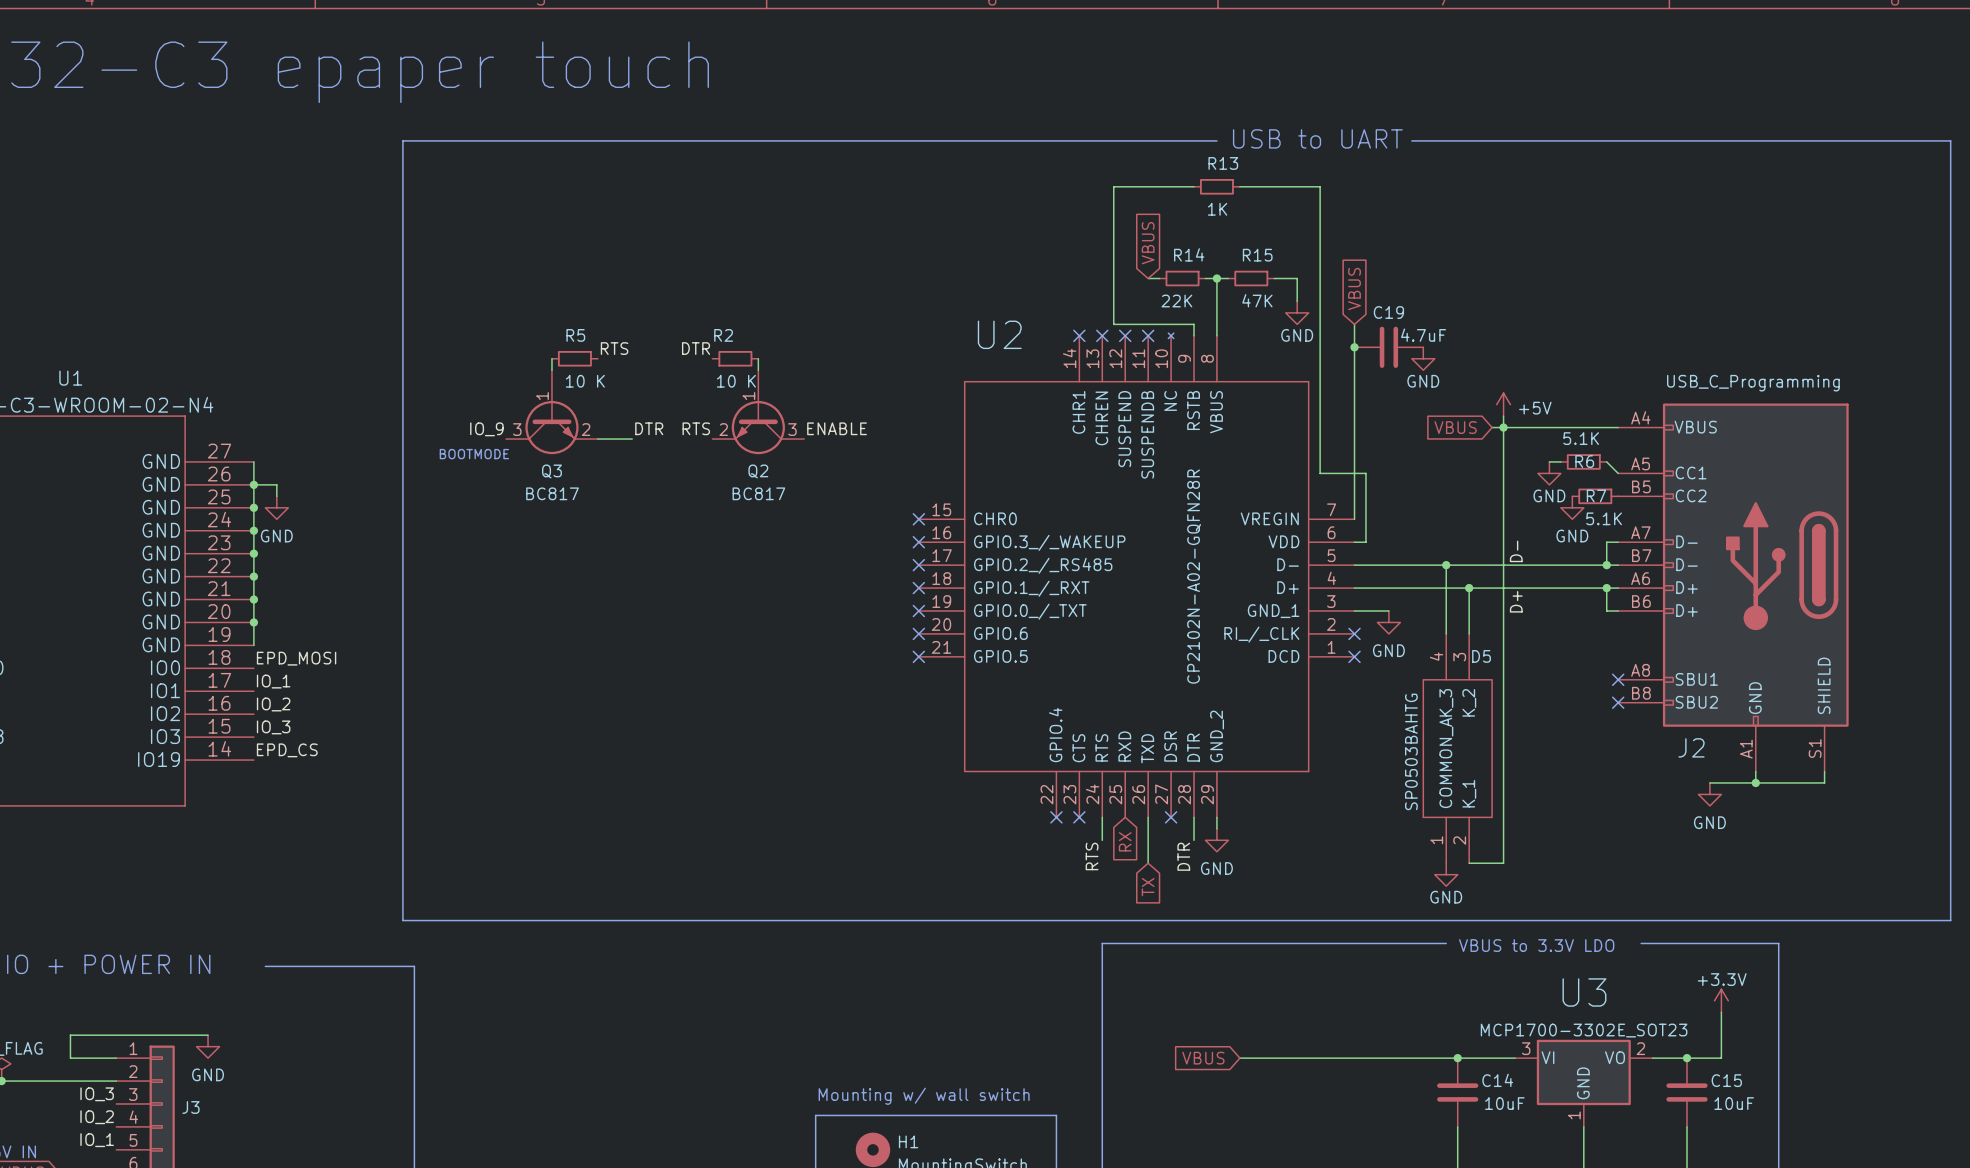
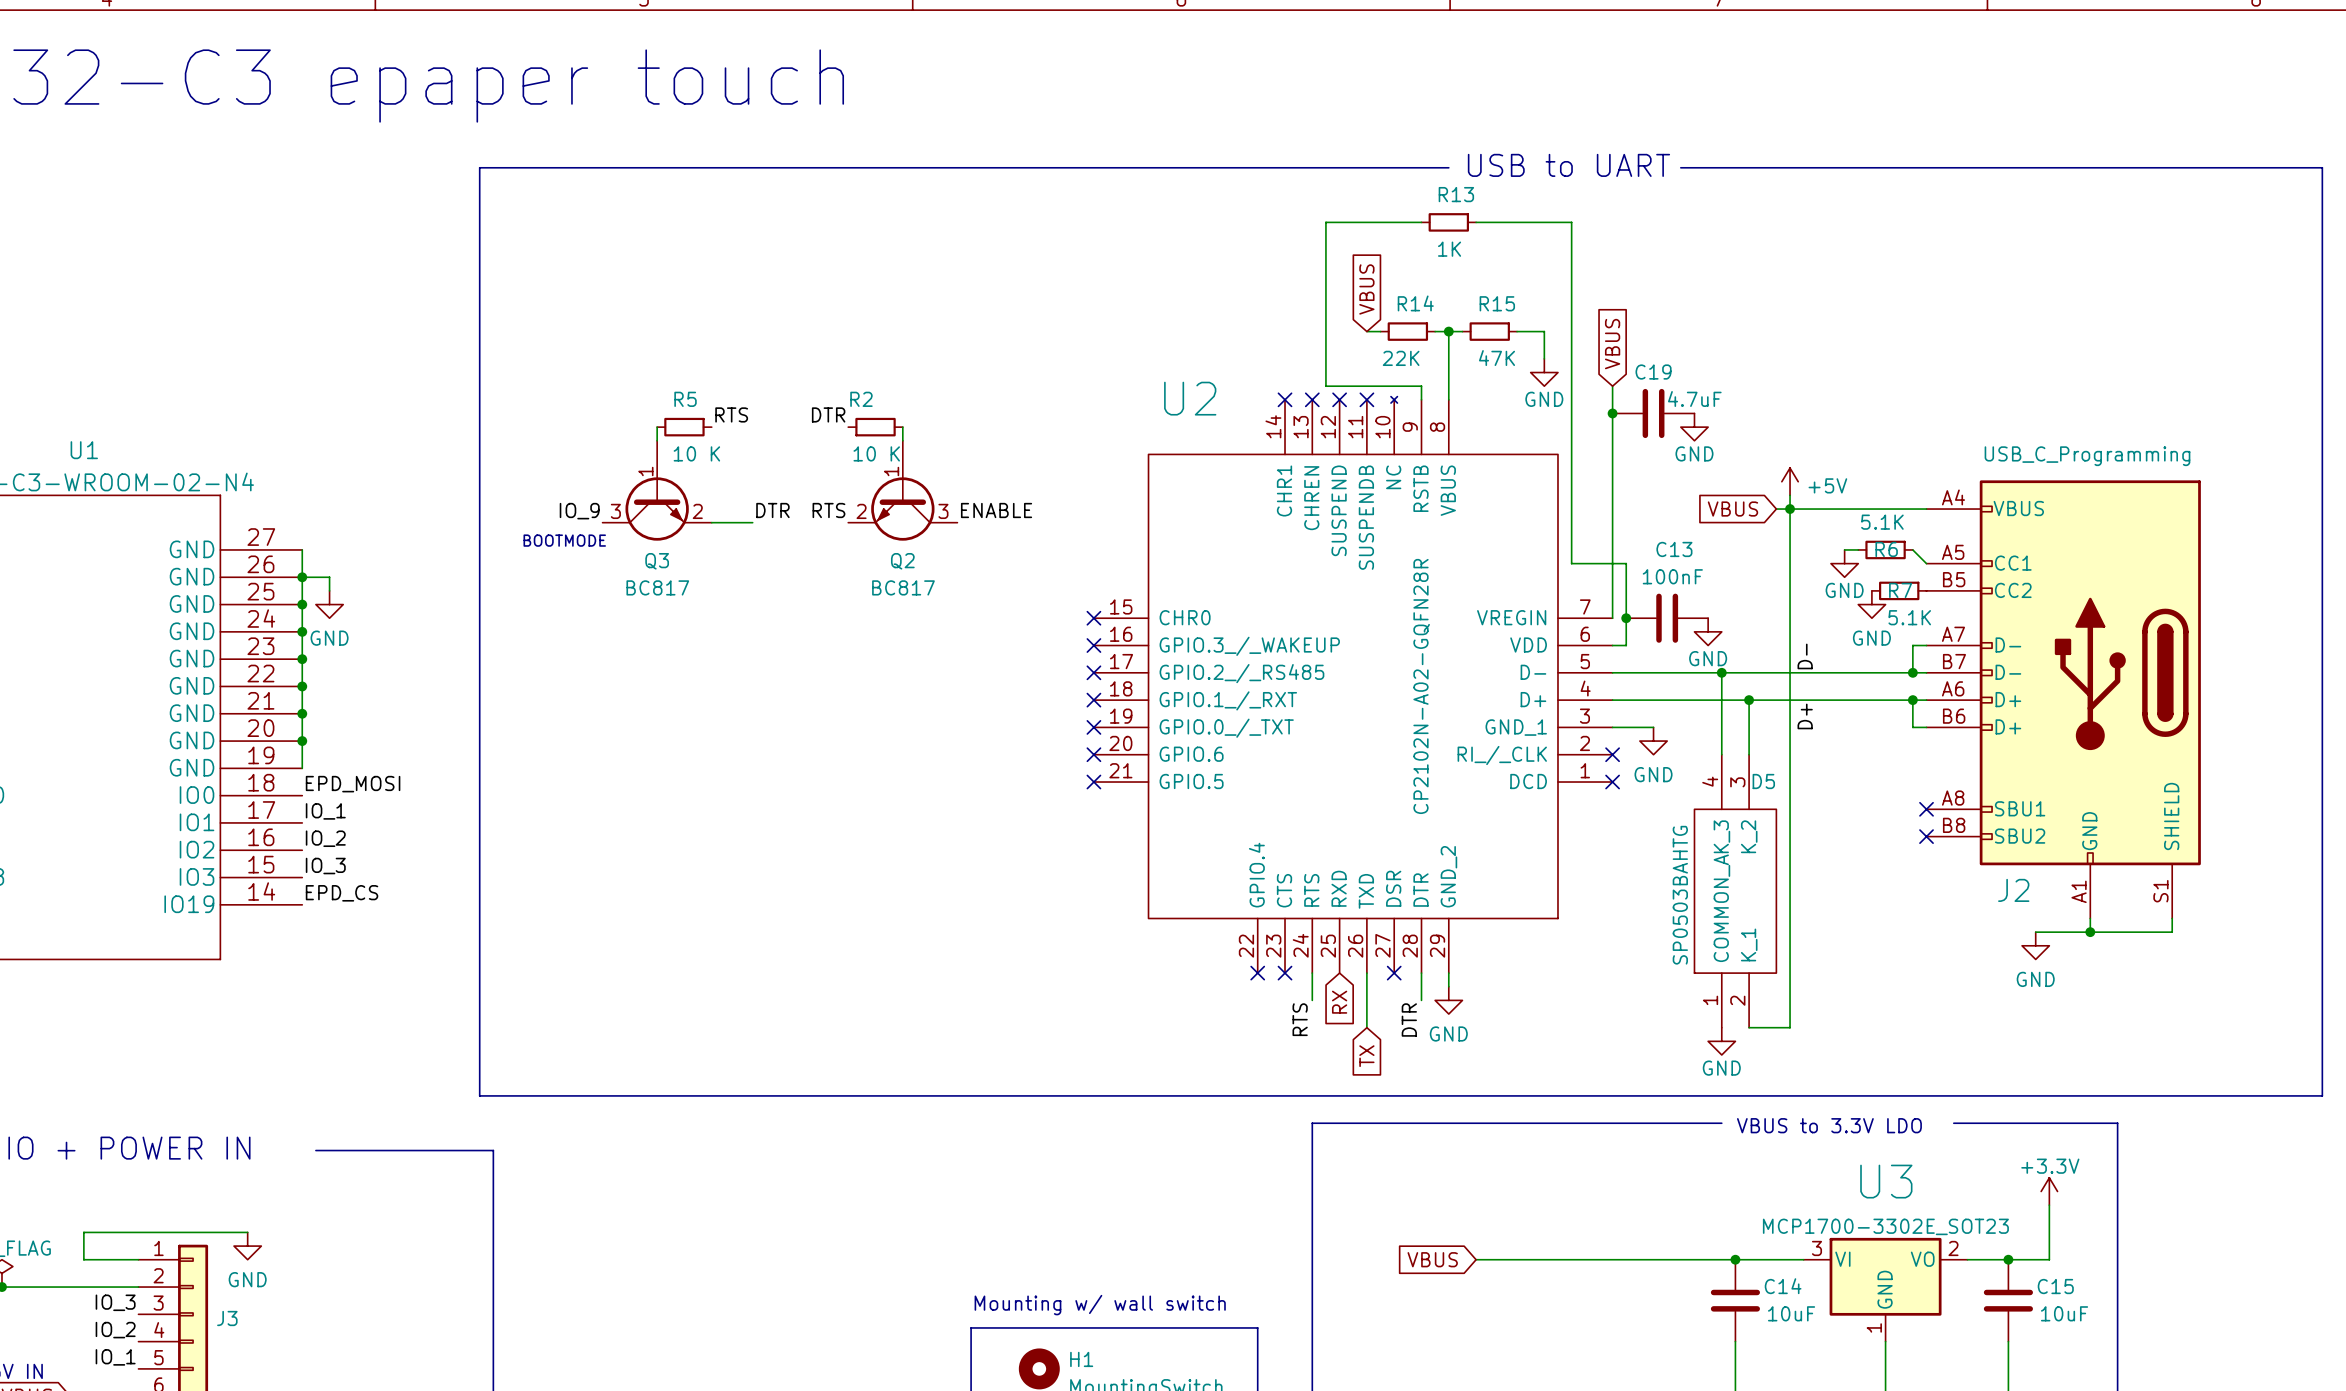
junction: none -> (1626, 618)
C13: none -> 100nF (1667, 618)
power symbol: none -> GND (1708, 631)

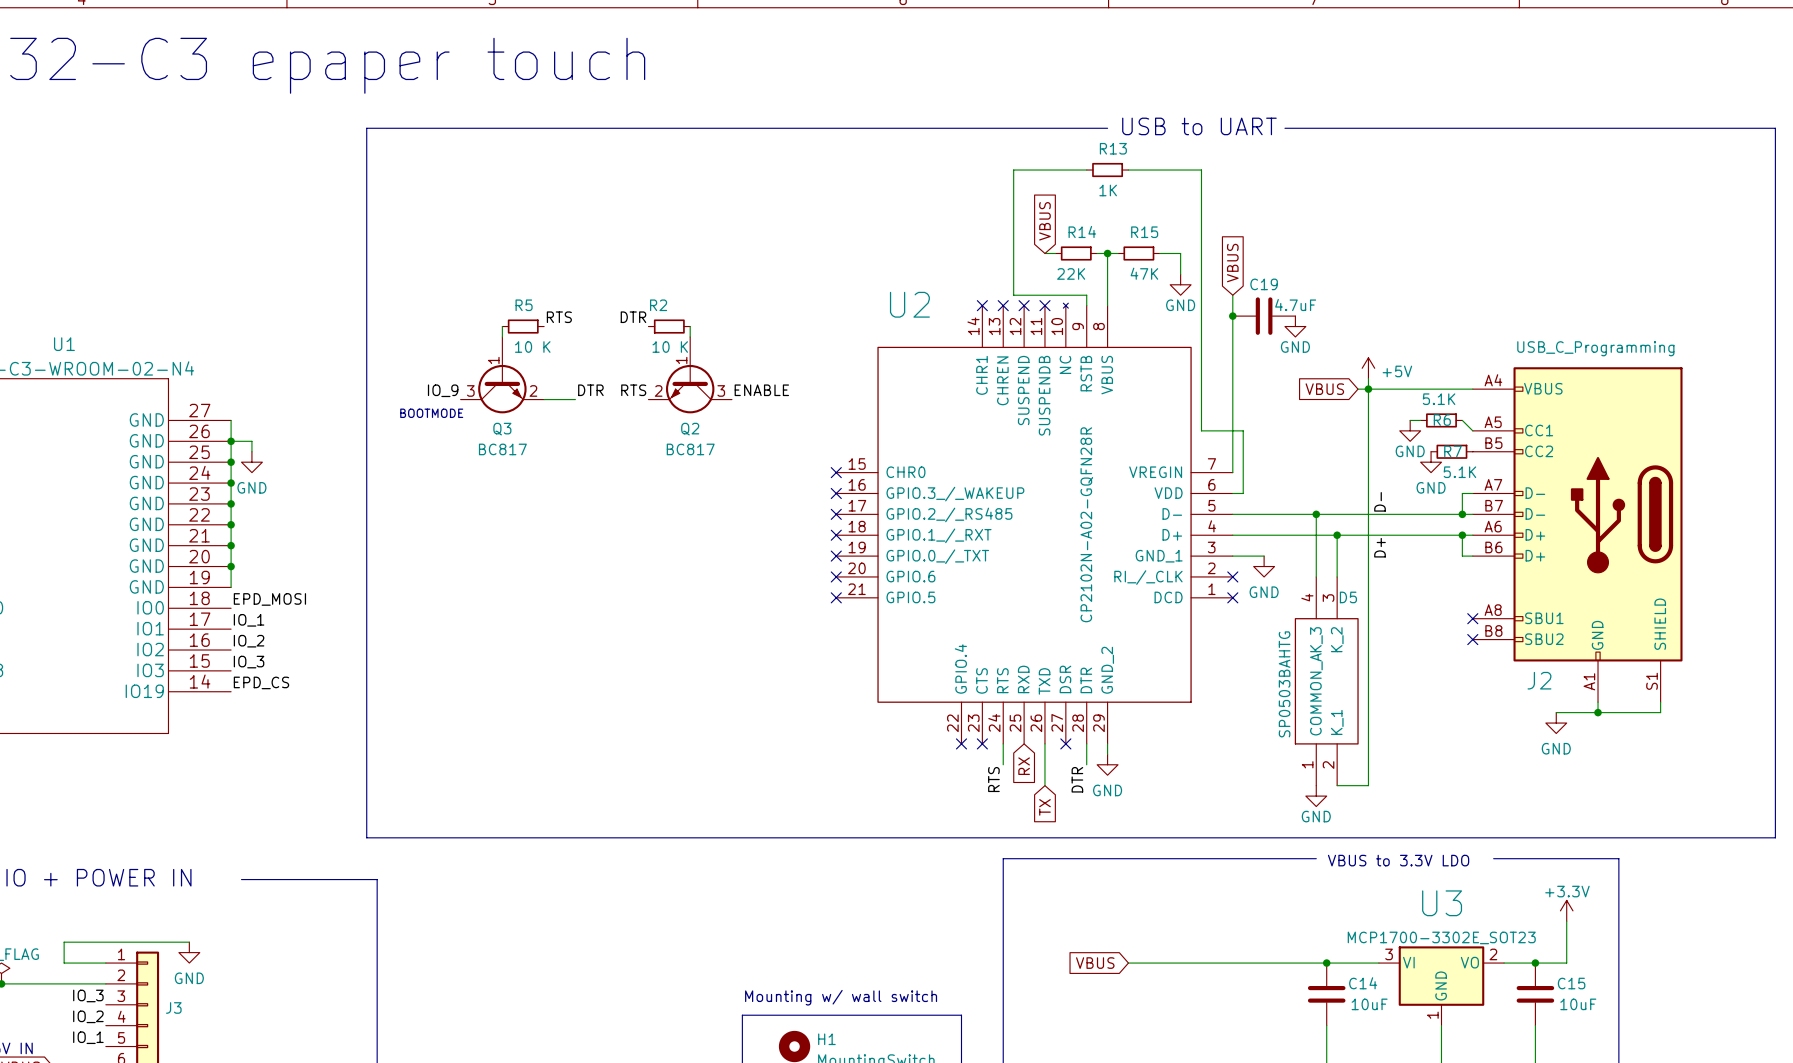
junction: (1626, 618) -> none
C13: 100nF (1667, 618) -> none
power symbol: GND (1708, 631) -> none

